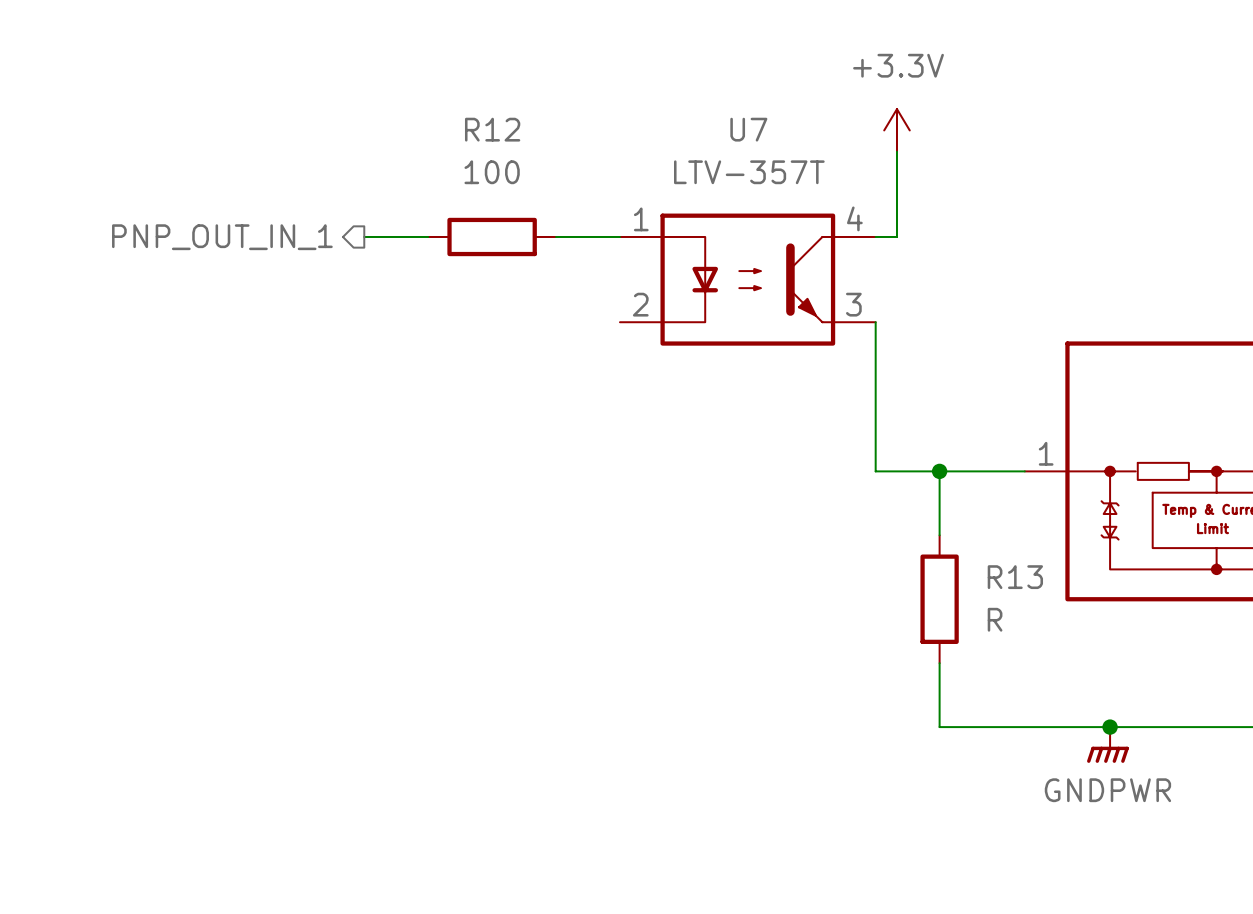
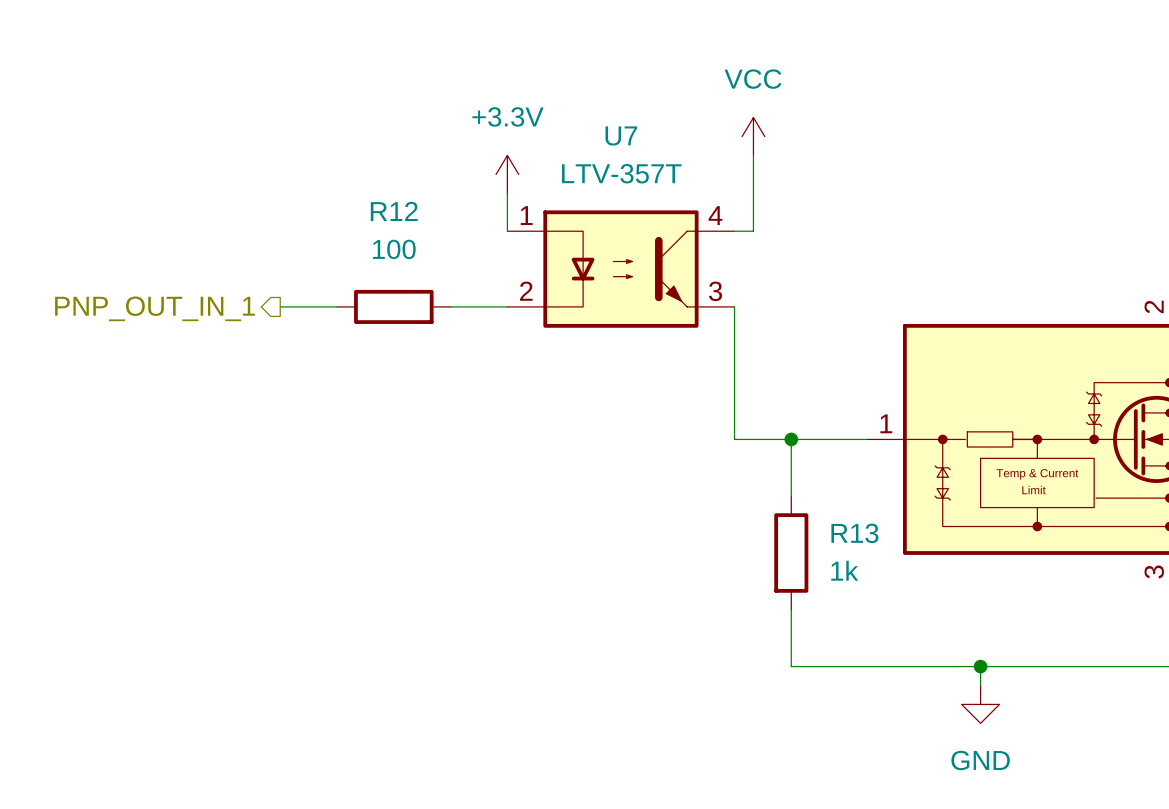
power symbol: +3.3V (896, 130) -> VCC (753, 136)
power symbol: none -> +3.3V (507, 174)
wire: (364, 236) (428, 236) -> (280, 306) (337, 306)
R12 position: (492, 236) -> (393, 306)
wire: (556, 236) (619, 236) -> (507, 193) (507, 231)
hierarchical label position: PNP_OUT_IN_1 (222, 237) -> PNP_OUT_IN_1 (154, 308)
wire: none -> (450, 306) (507, 306)
R13 value: R (995, 619) -> 1k (844, 570)
junction position: (1110, 727) -> (980, 666)
wire: none -> (980, 666) (980, 685)
power symbol: GNDPWR (1107, 744) -> none
power symbol: none -> GND (980, 704)

